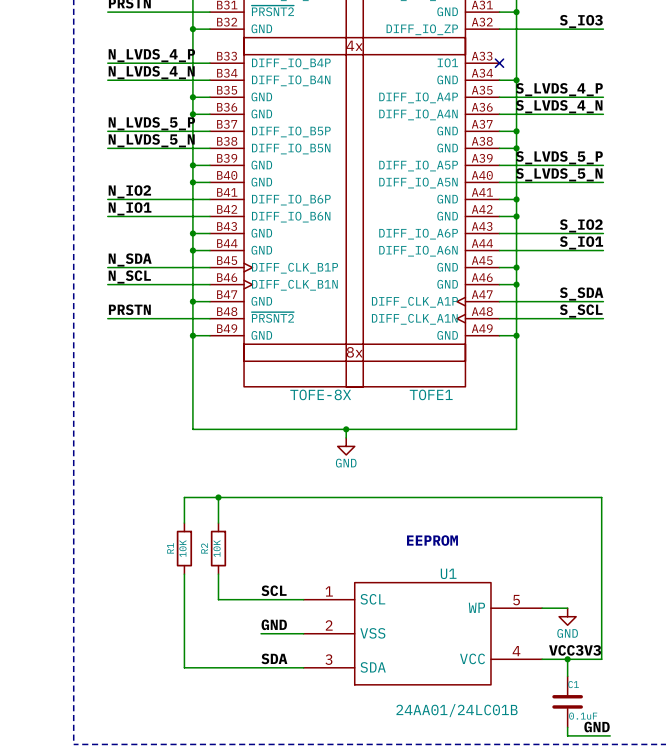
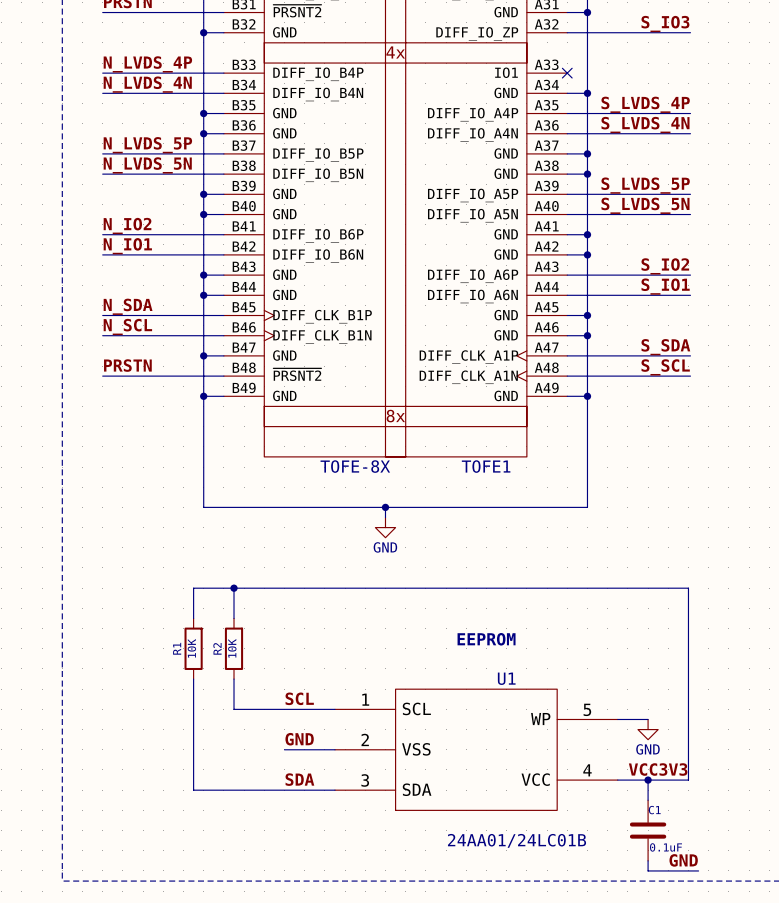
label: N_LVDS_4_P (151, 55) -> N_LVDS_4P (147, 64)
label: N_LVDS_4_N (151, 72) -> N_LVDS_4N (147, 84)
label: S_LVDS_4_P (559, 89) -> S_LVDS_4P (645, 104)
label: S_LVDS_4_N (559, 106) -> S_LVDS_4N (645, 125)
label: N_LVDS_5_P (151, 123) -> N_LVDS_5P (147, 145)
label: N_LVDS_5_N (151, 140) -> N_LVDS_5N (147, 165)
label: S_LVDS_5_P (559, 157) -> S_LVDS_5P (645, 185)
label: S_LVDS_5_N (559, 174) -> S_LVDS_5N (645, 205)

